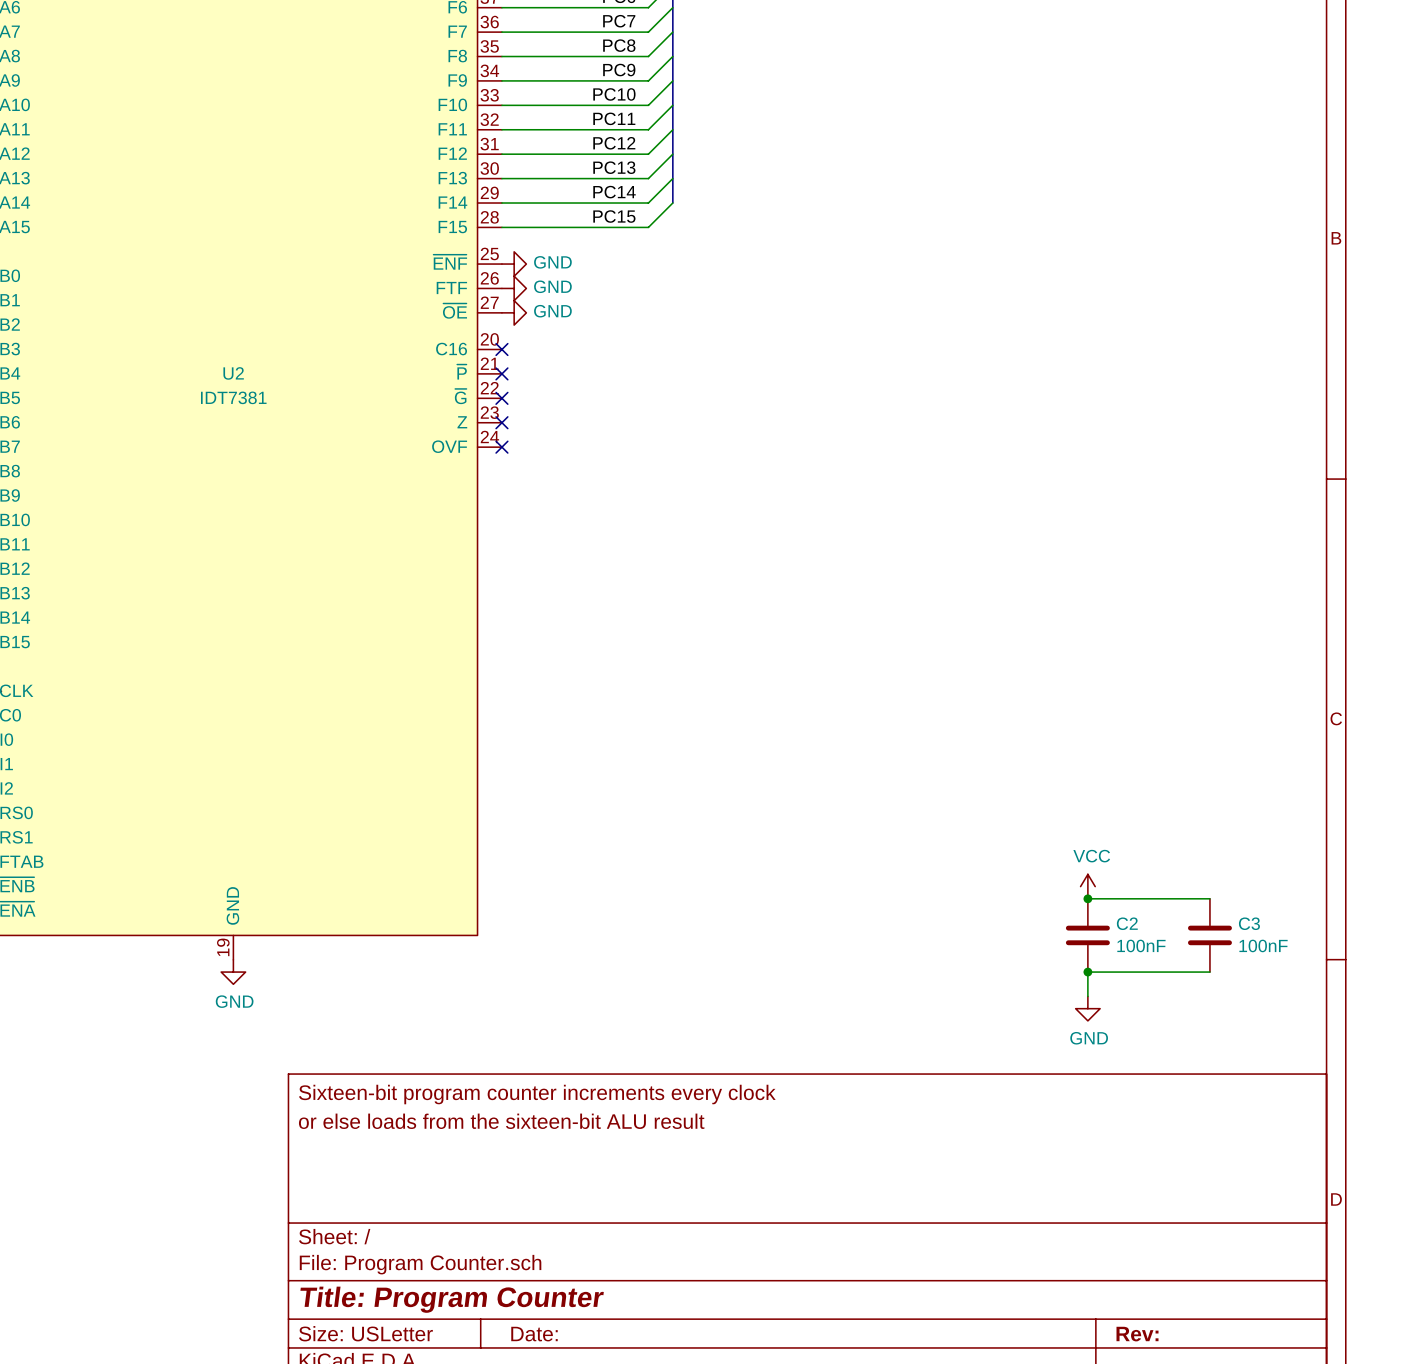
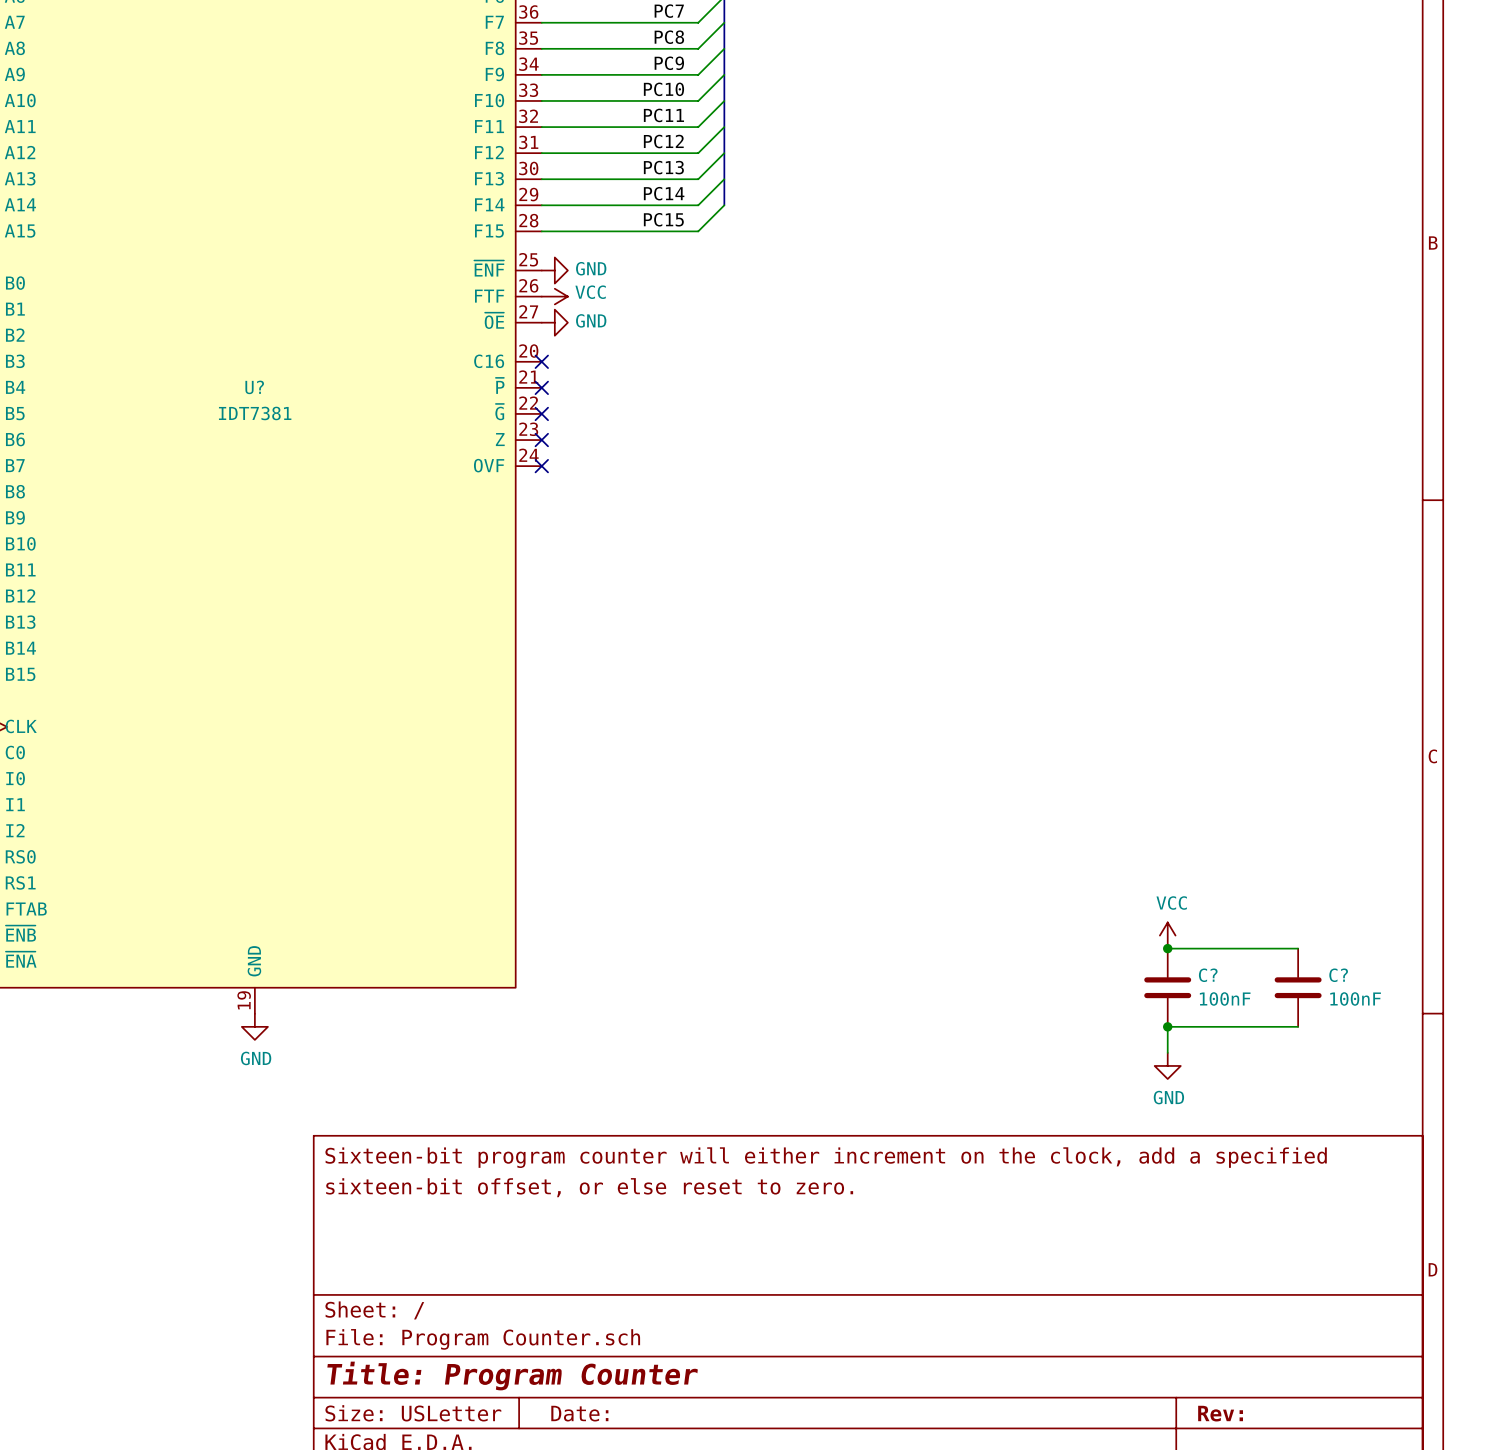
power symbol: GND (514, 288) -> VCC (554, 296)
U2 name: U2 (233, 373) -> U? (254, 387)
C2 name: C2 (1127, 923) -> C? (1208, 975)
C3 name: C3 (1249, 923) -> C? (1338, 975)
title block: Sixteen-bit program counter increments every clock (537, 1094) -> Sixteen-bit program counter will either increment on the clock, add a specified (826, 1157)
title block: or else loads from the sixteen-bit ALU result (501, 1121) -> sixteen-bit offset, or else reset to zero. (589, 1187)

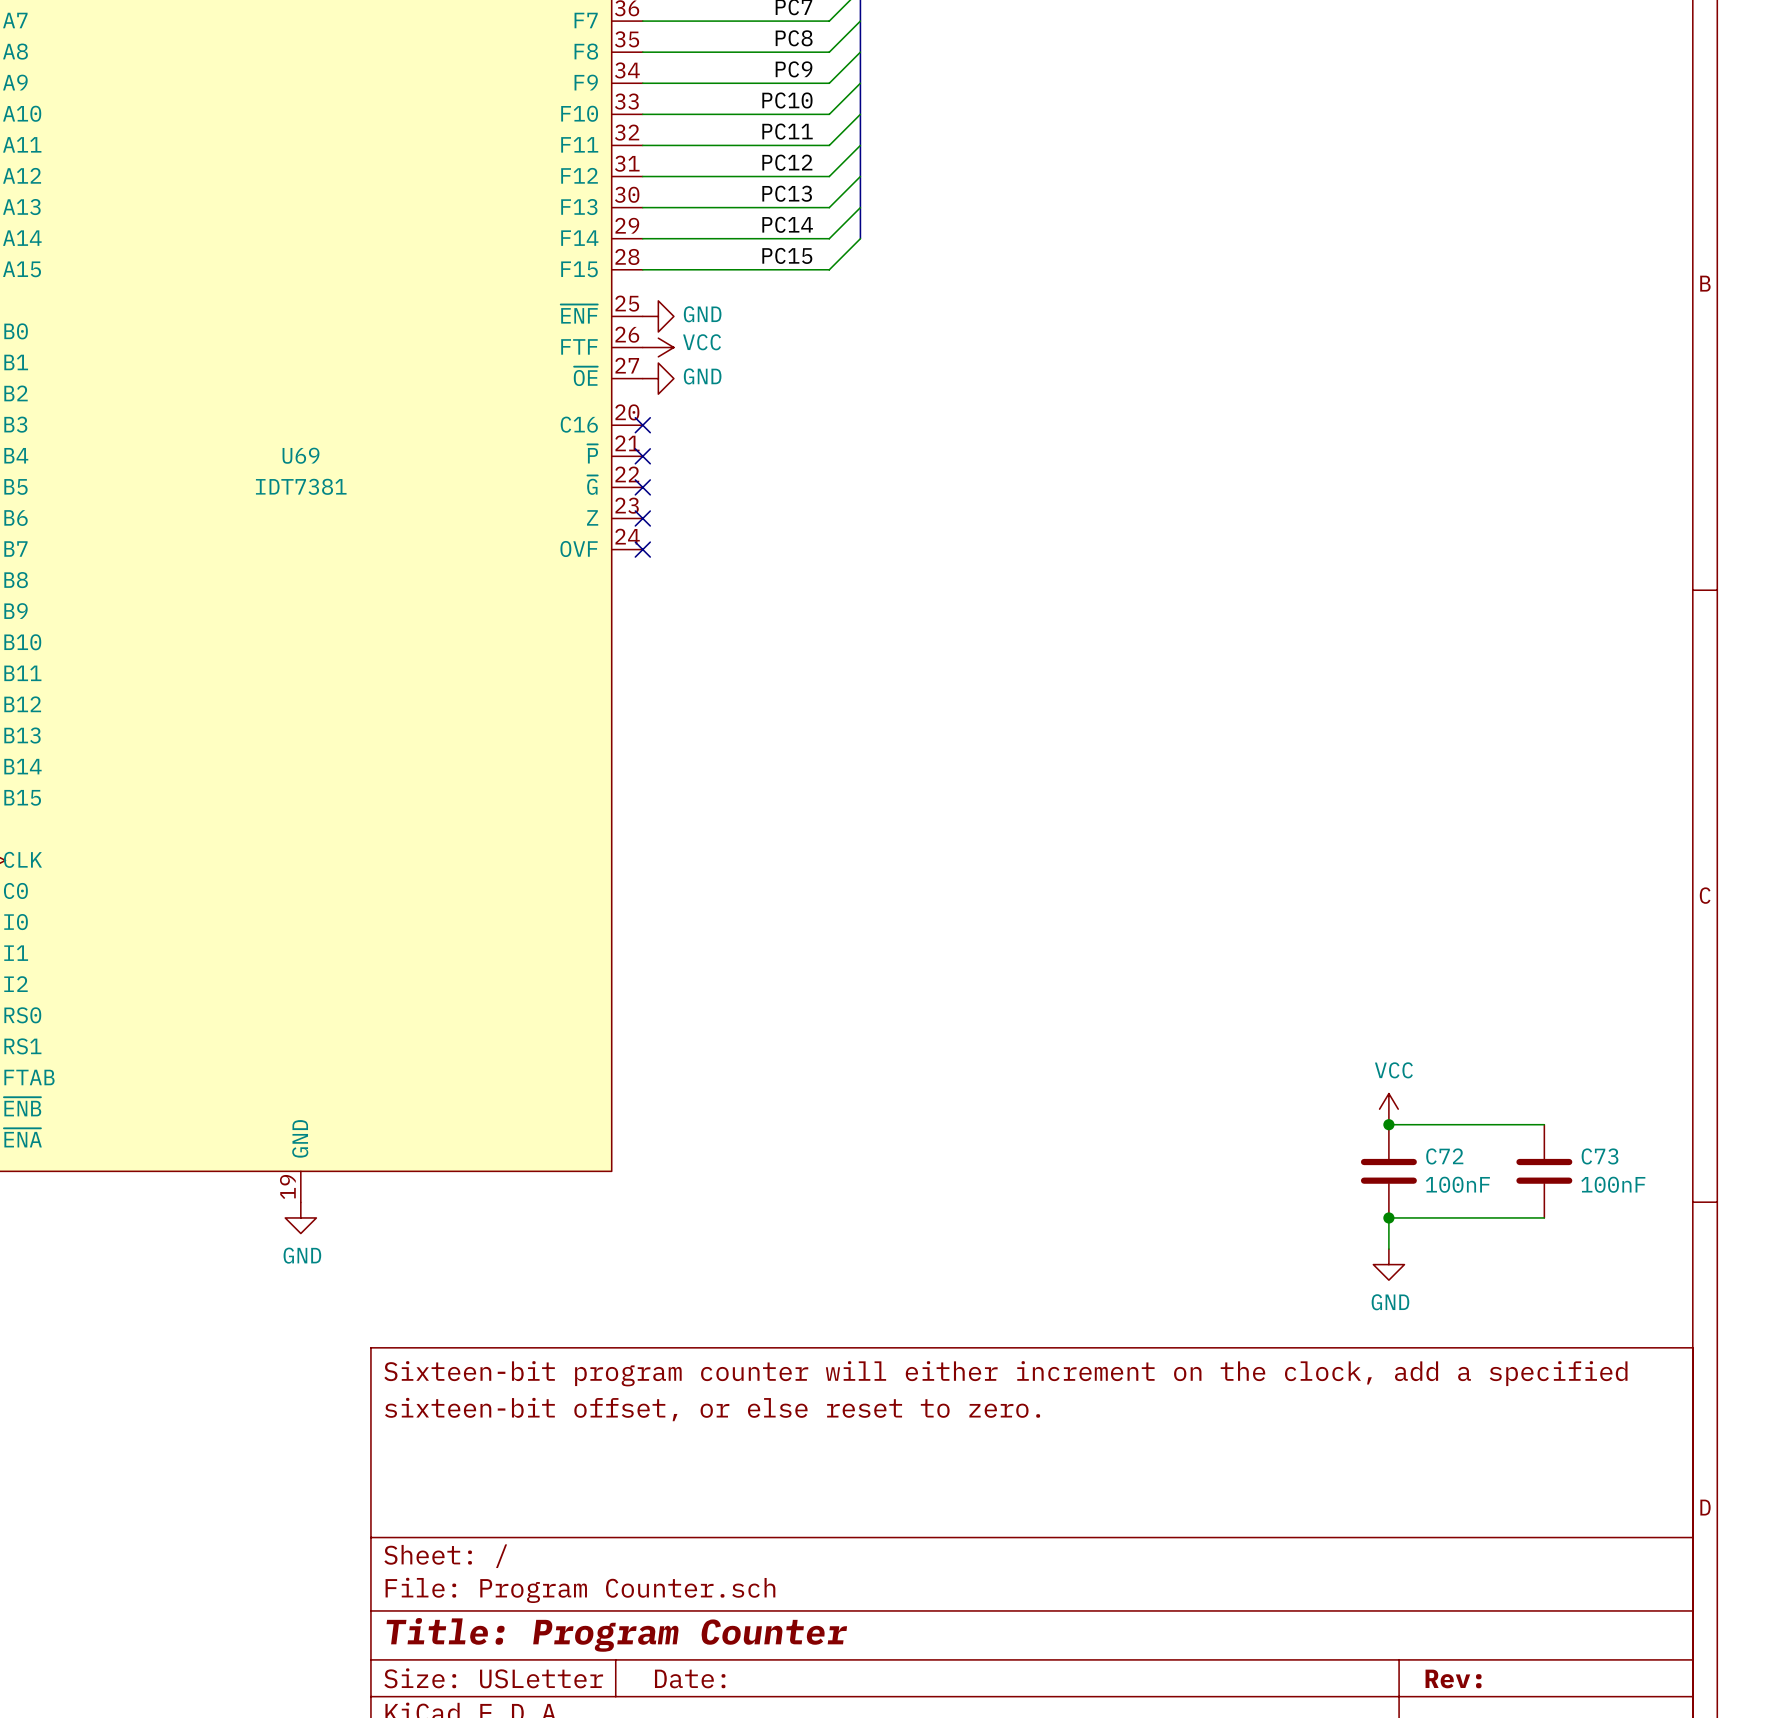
U? name: U? (254, 387) -> U69 (301, 455)
C? name: C? (1208, 975) -> C72 (1444, 1156)
C? name: C? (1338, 975) -> C73 (1600, 1156)

